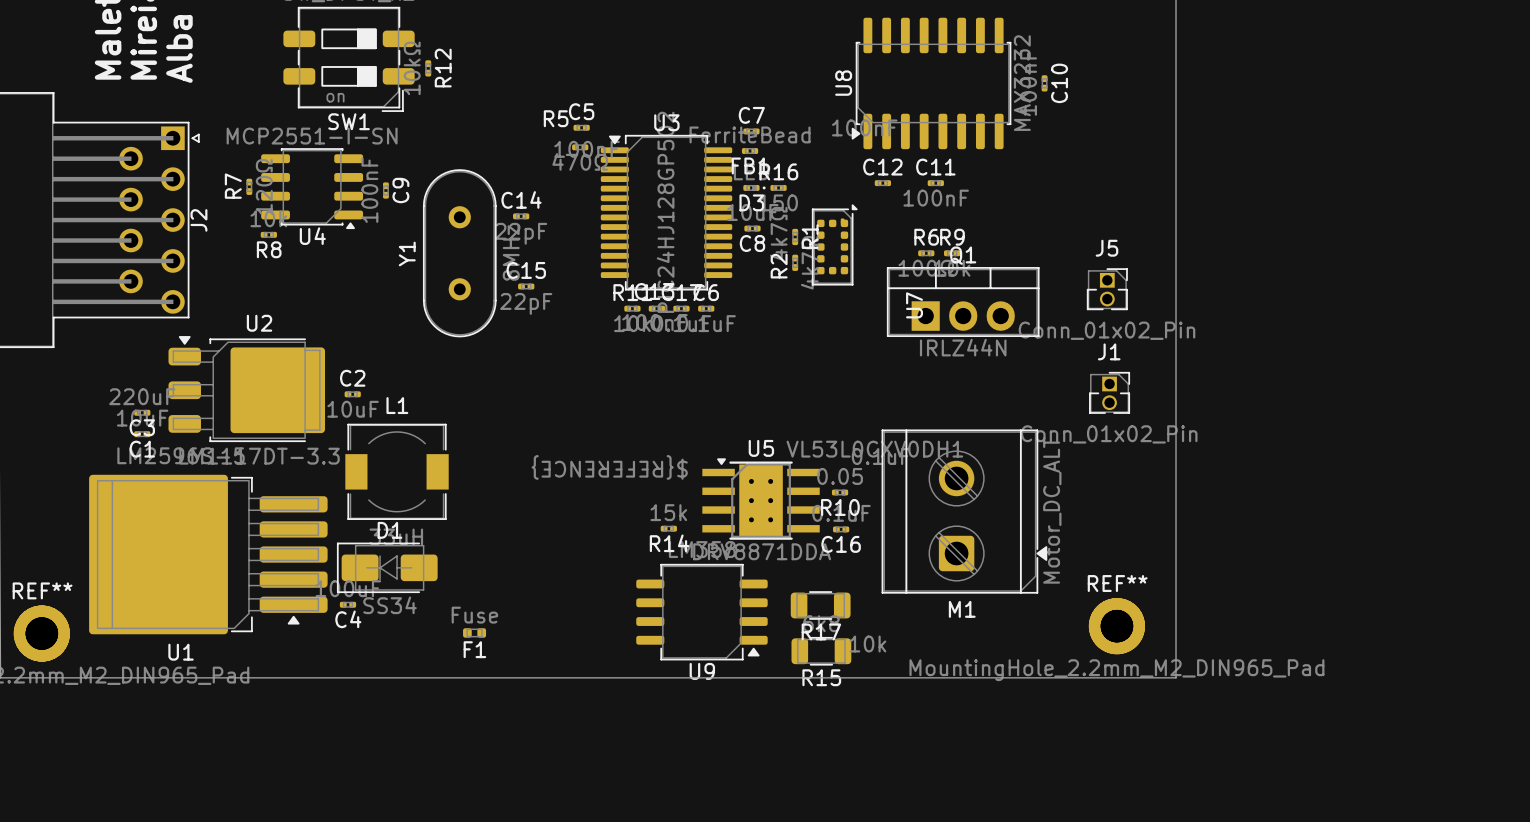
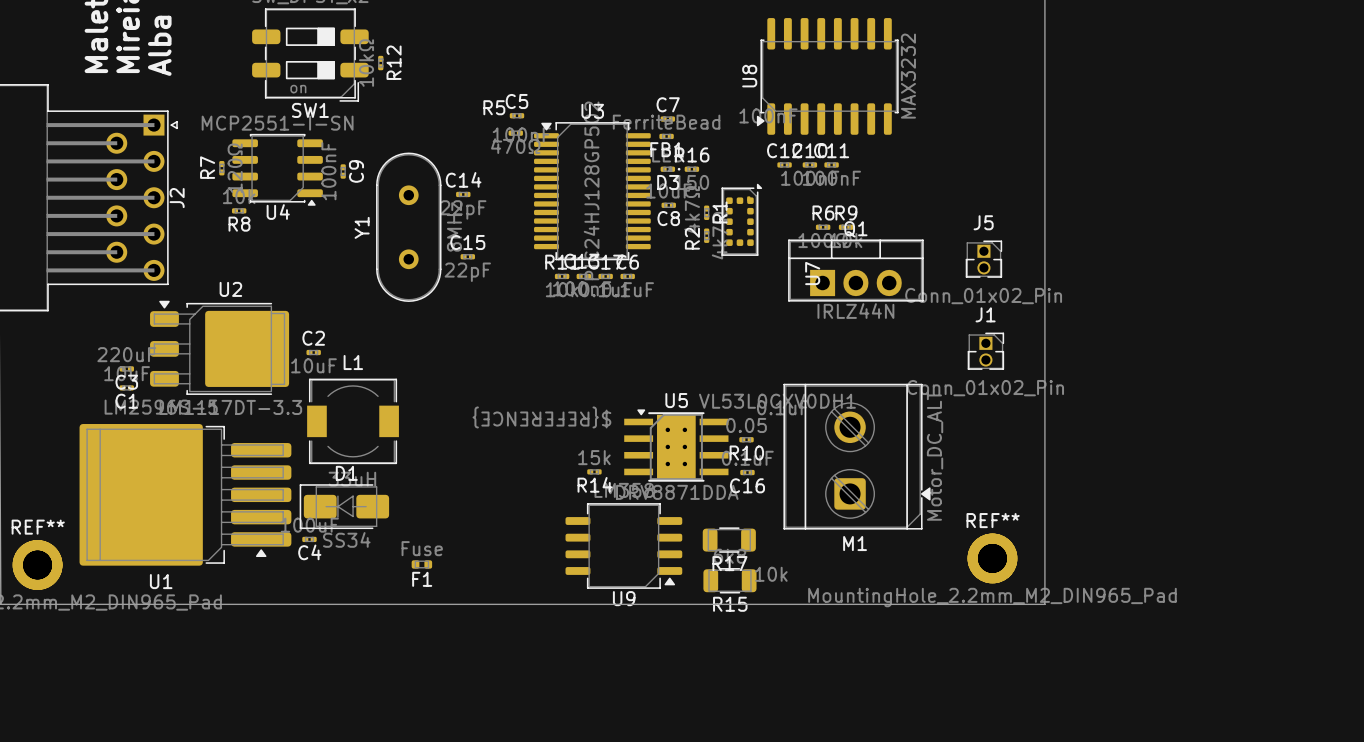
C10 rotation: 0° (1044, 83) -> 90° clockwise (809, 164)
C10 position: (1044, 83) -> (809, 164)

